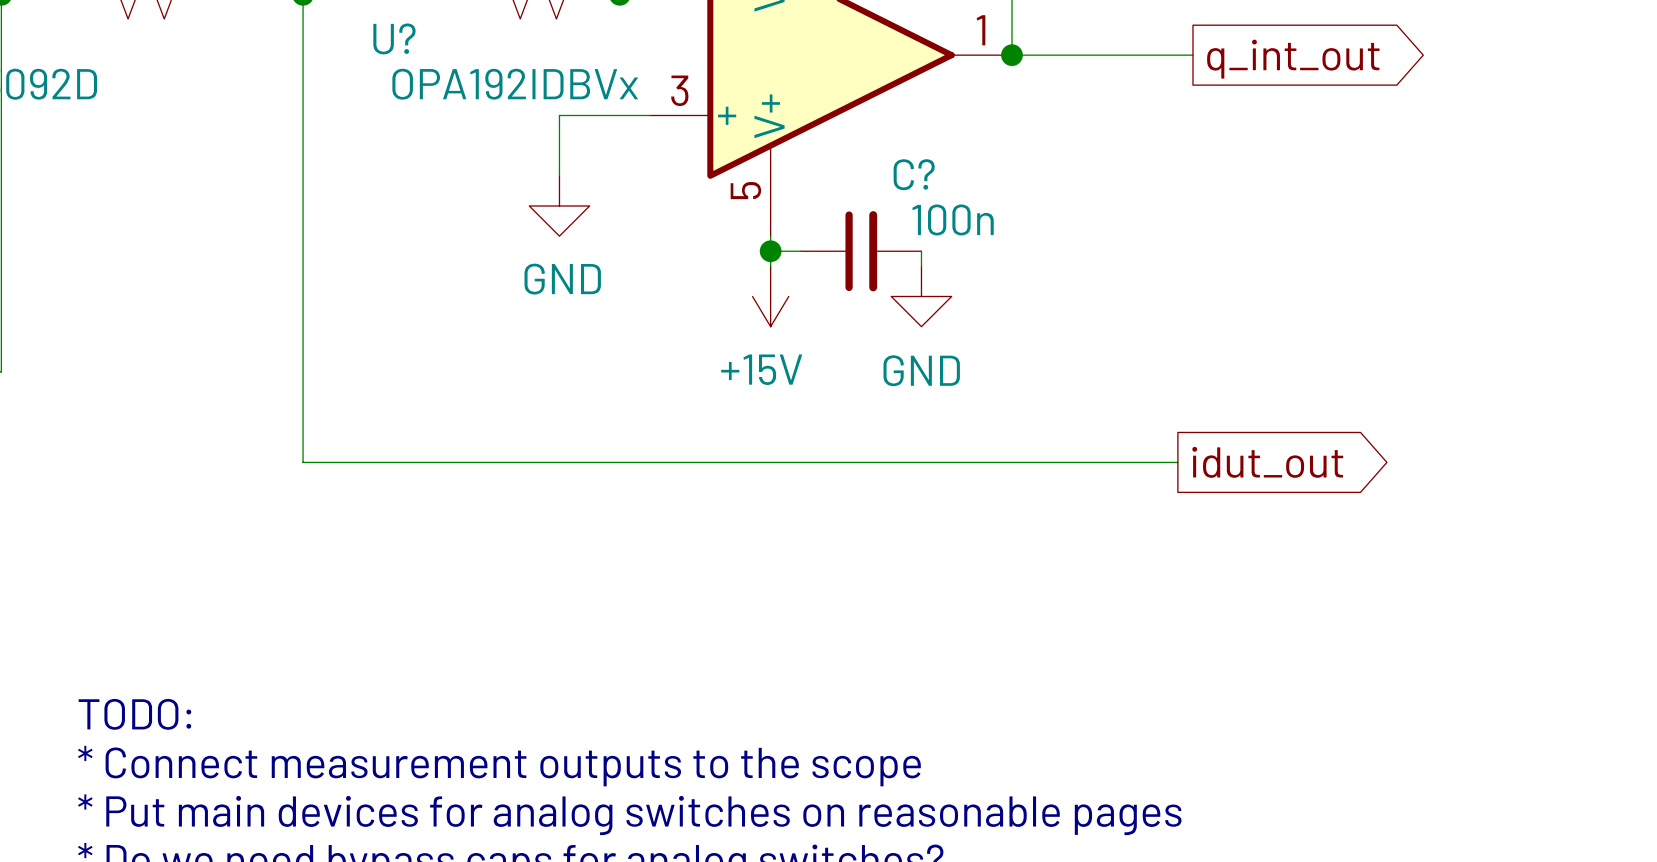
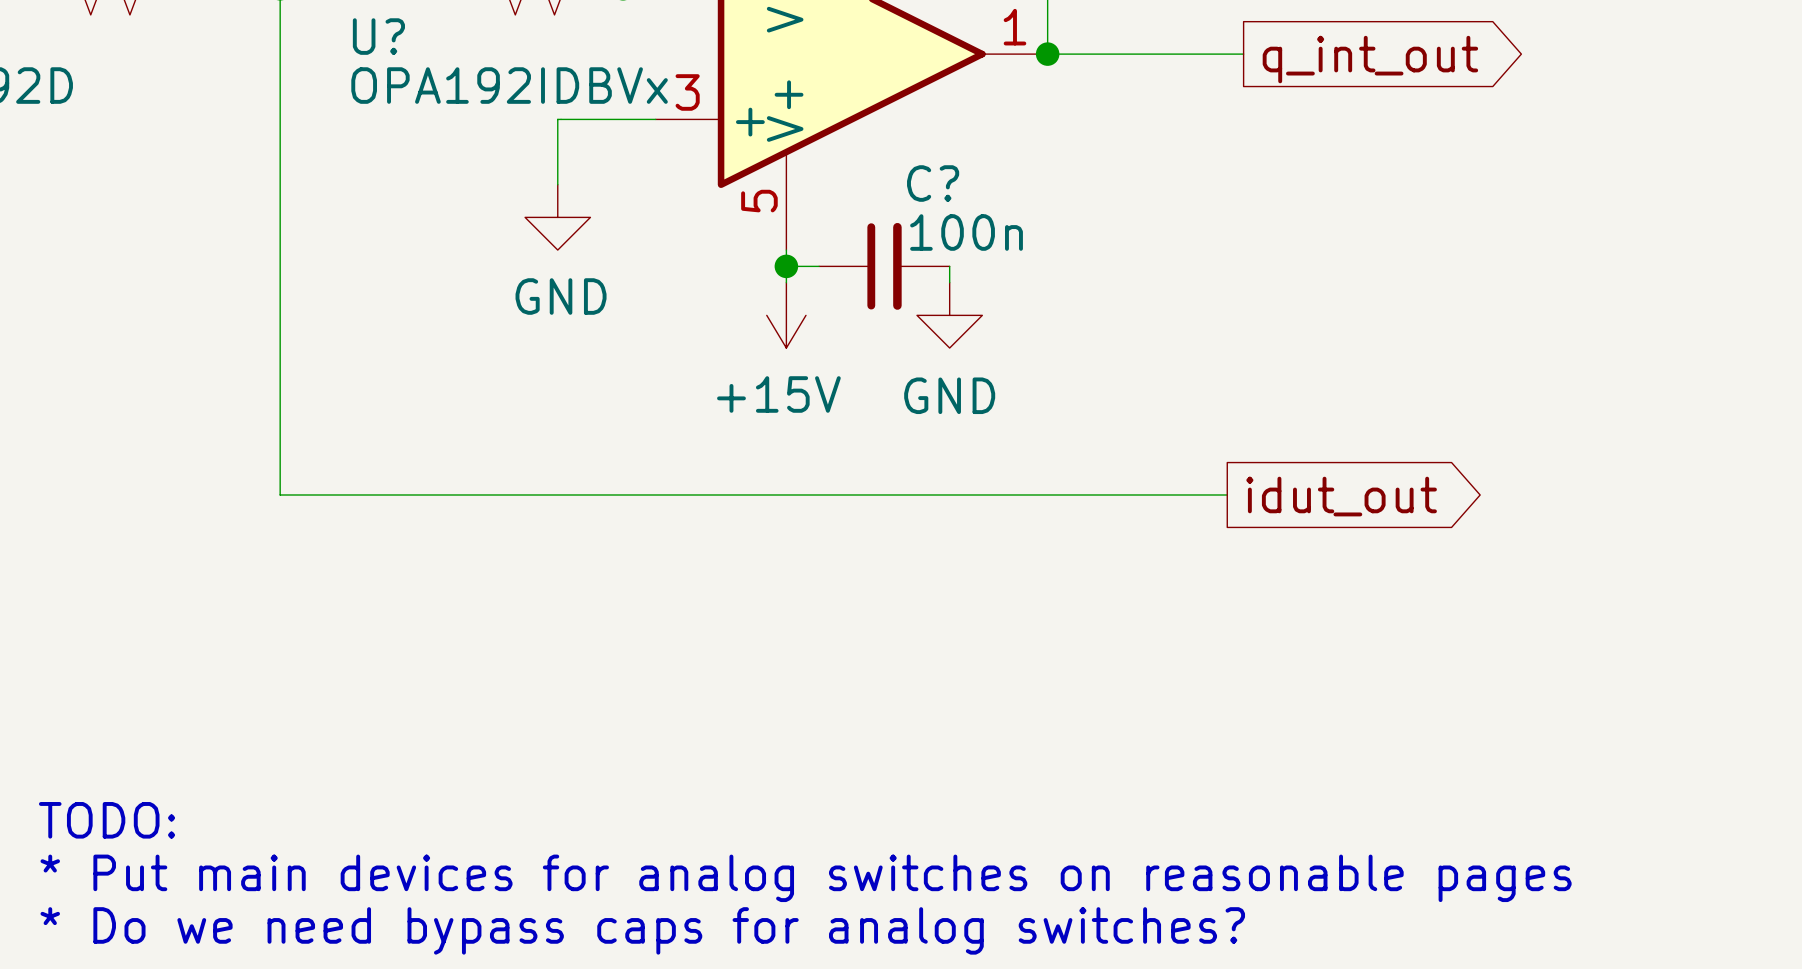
text: TODO: (134, 714) -> none
text: * Connect measurement outputs to the scope (499, 766) -> TODO: (107, 820)

